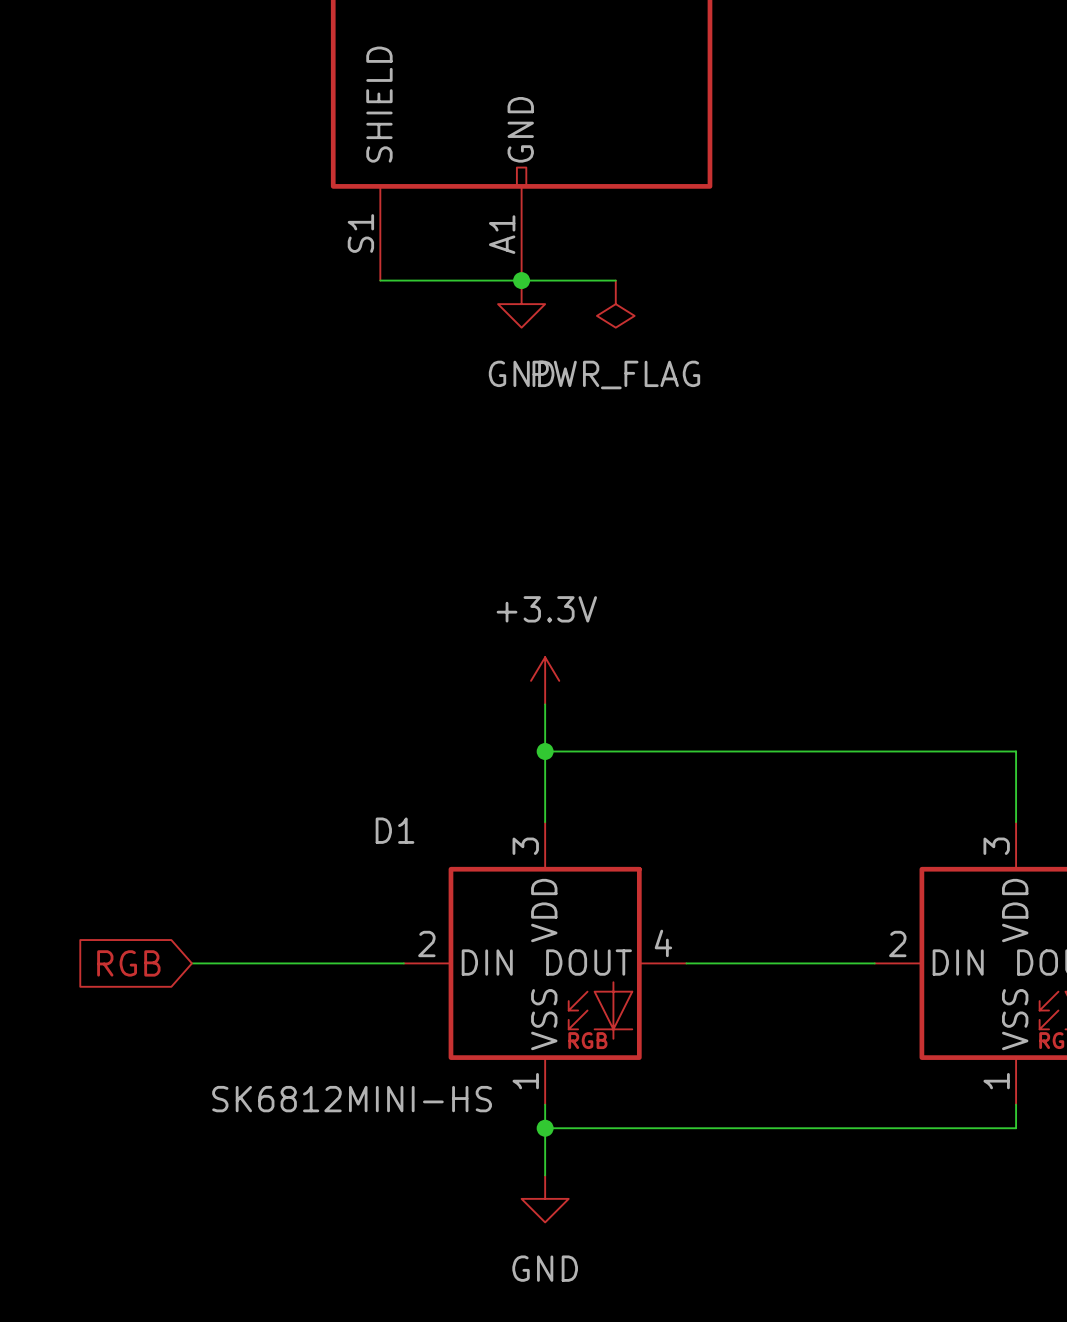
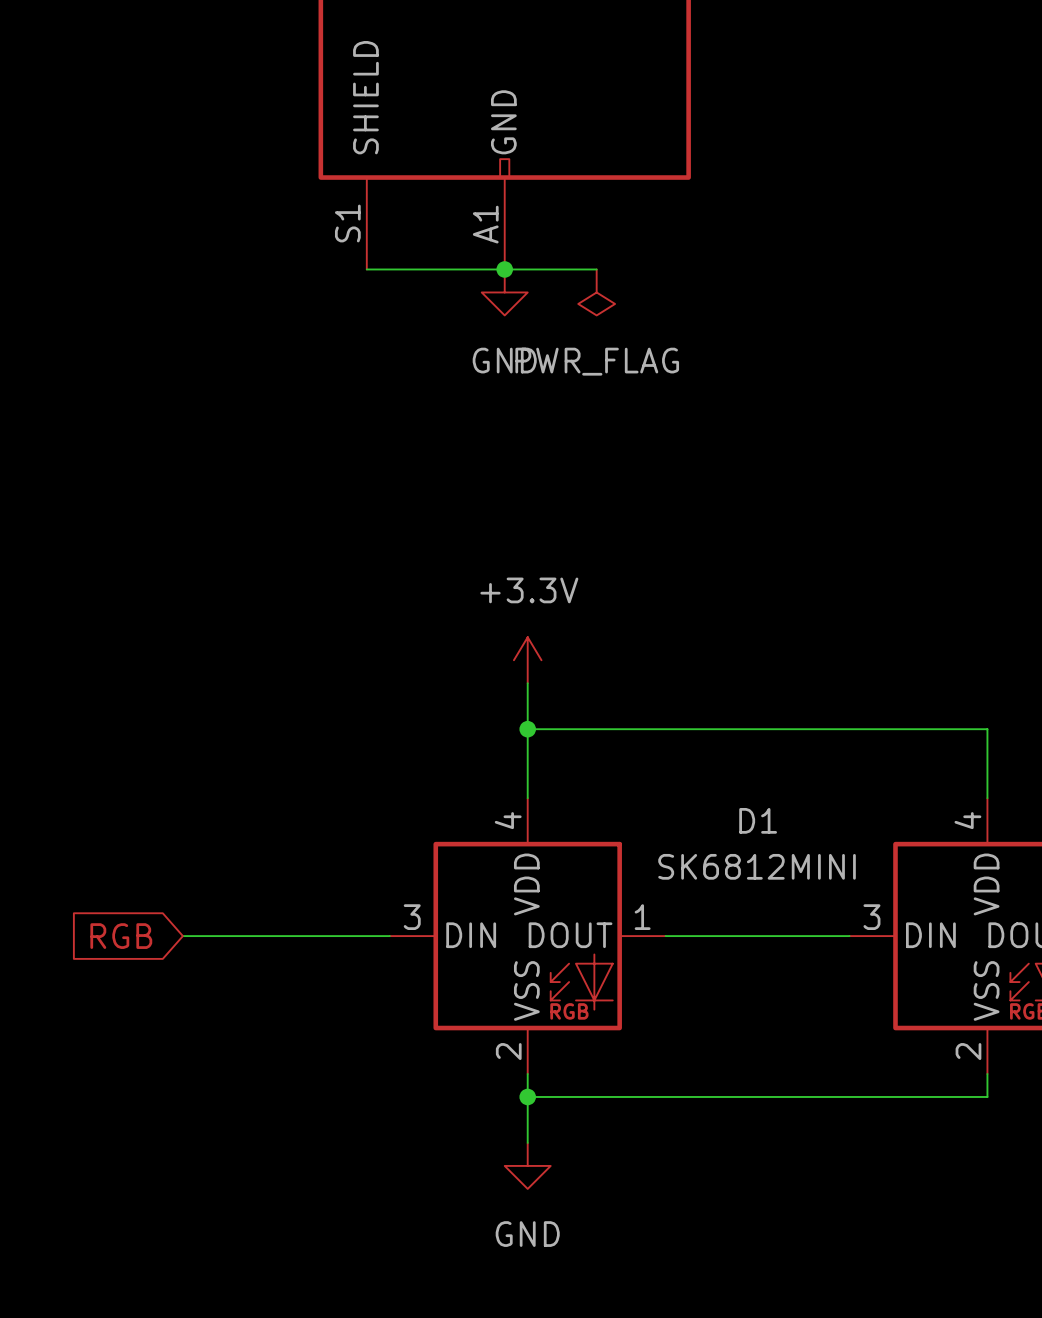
D1 name position: D1 (395, 830) -> D1 (758, 820)
D1 pin number: 3 (525, 846) -> 4 (508, 820)
part pin number: 3 (996, 846) -> 4 (967, 820)
D1 pin number: 2 (426, 943) -> 3 (412, 917)
D1 pin number: 4 (663, 943) -> 1 (642, 917)
part pin number: 2 (897, 943) -> 3 (871, 917)
D1 pin number: 1 (525, 1081) -> 2 (508, 1051)
part pin number: 1 (996, 1081) -> 2 (968, 1051)
D1 value: SK6812MINI-HS (352, 1099) -> SK6812MINI (757, 866)

